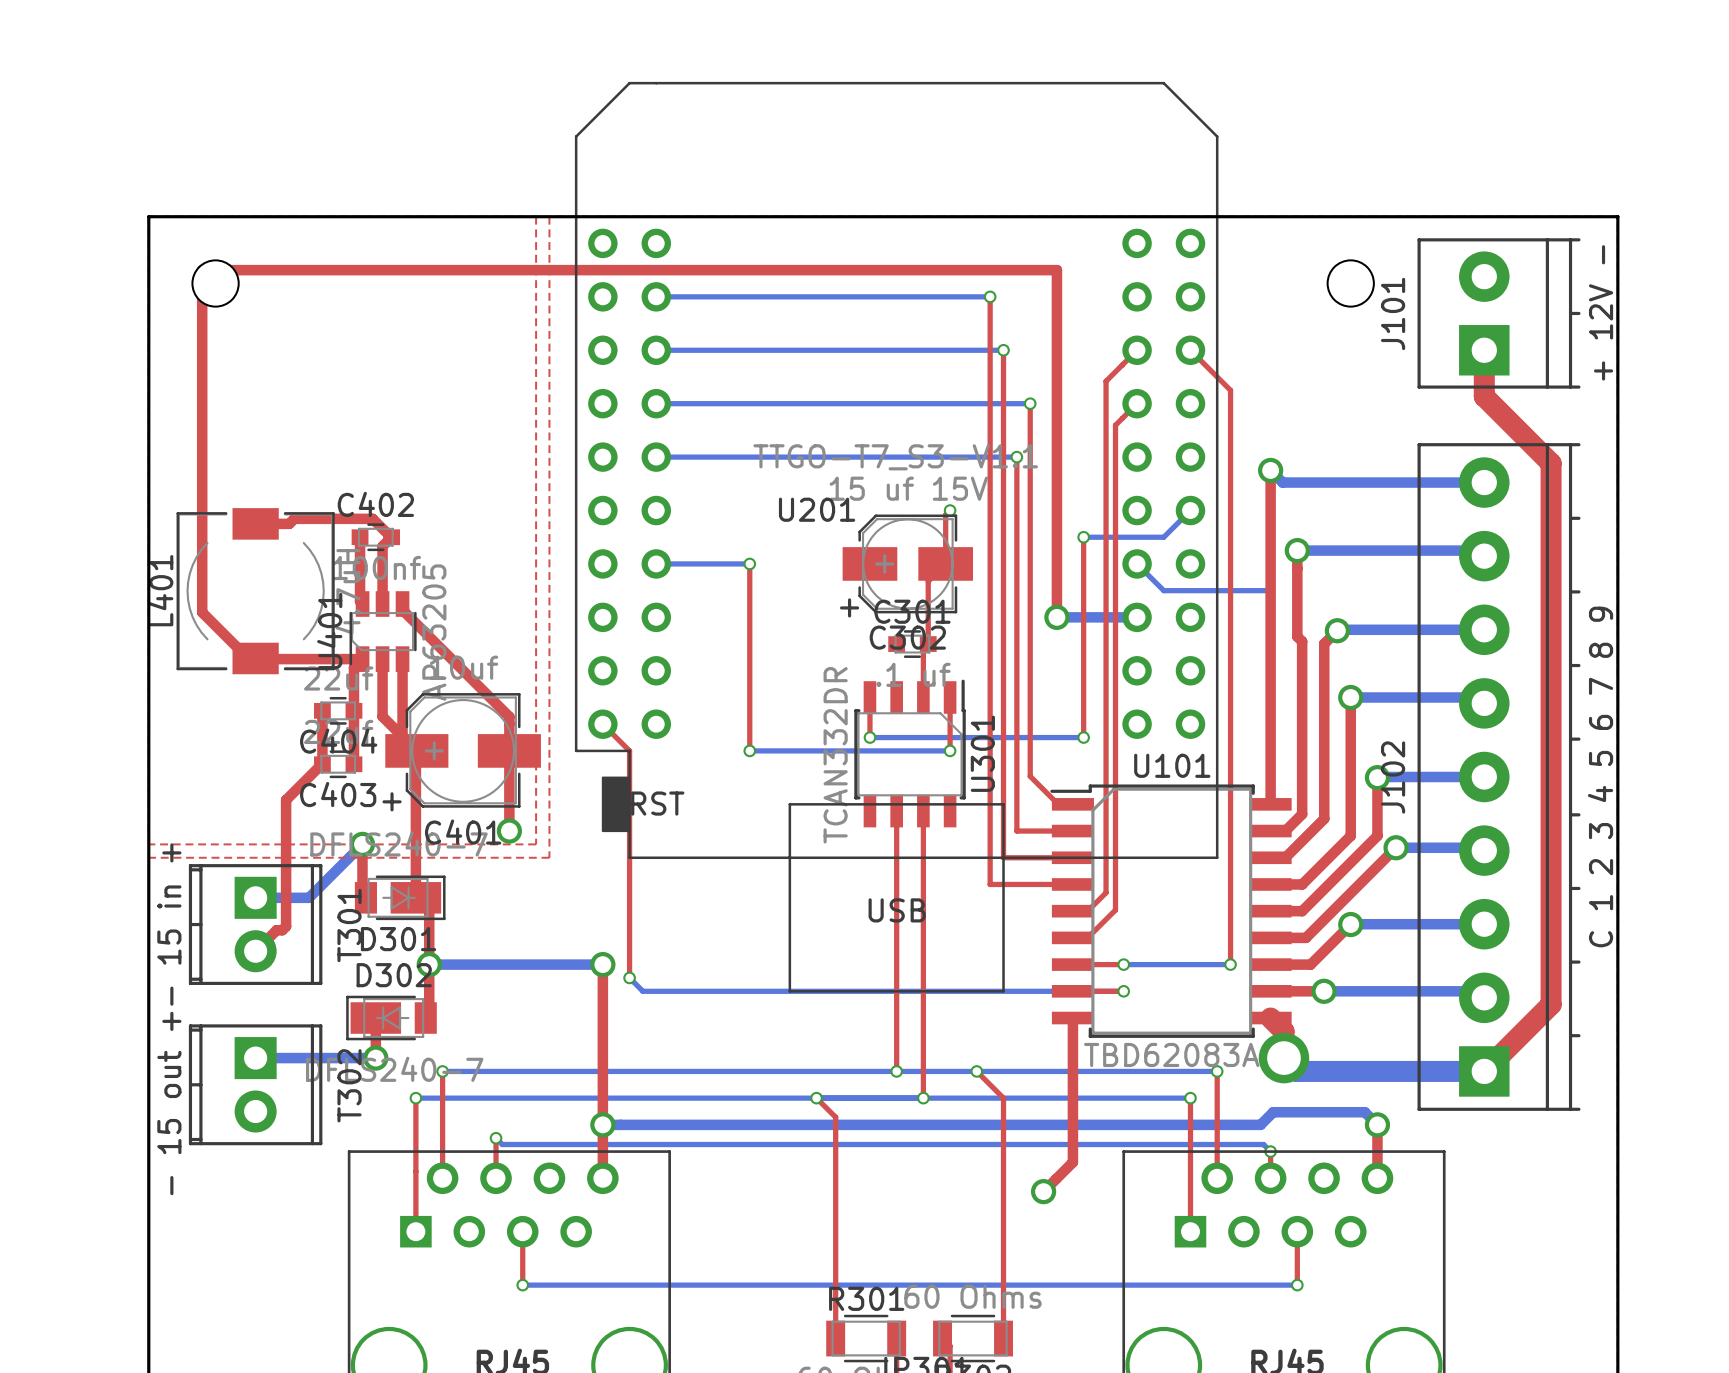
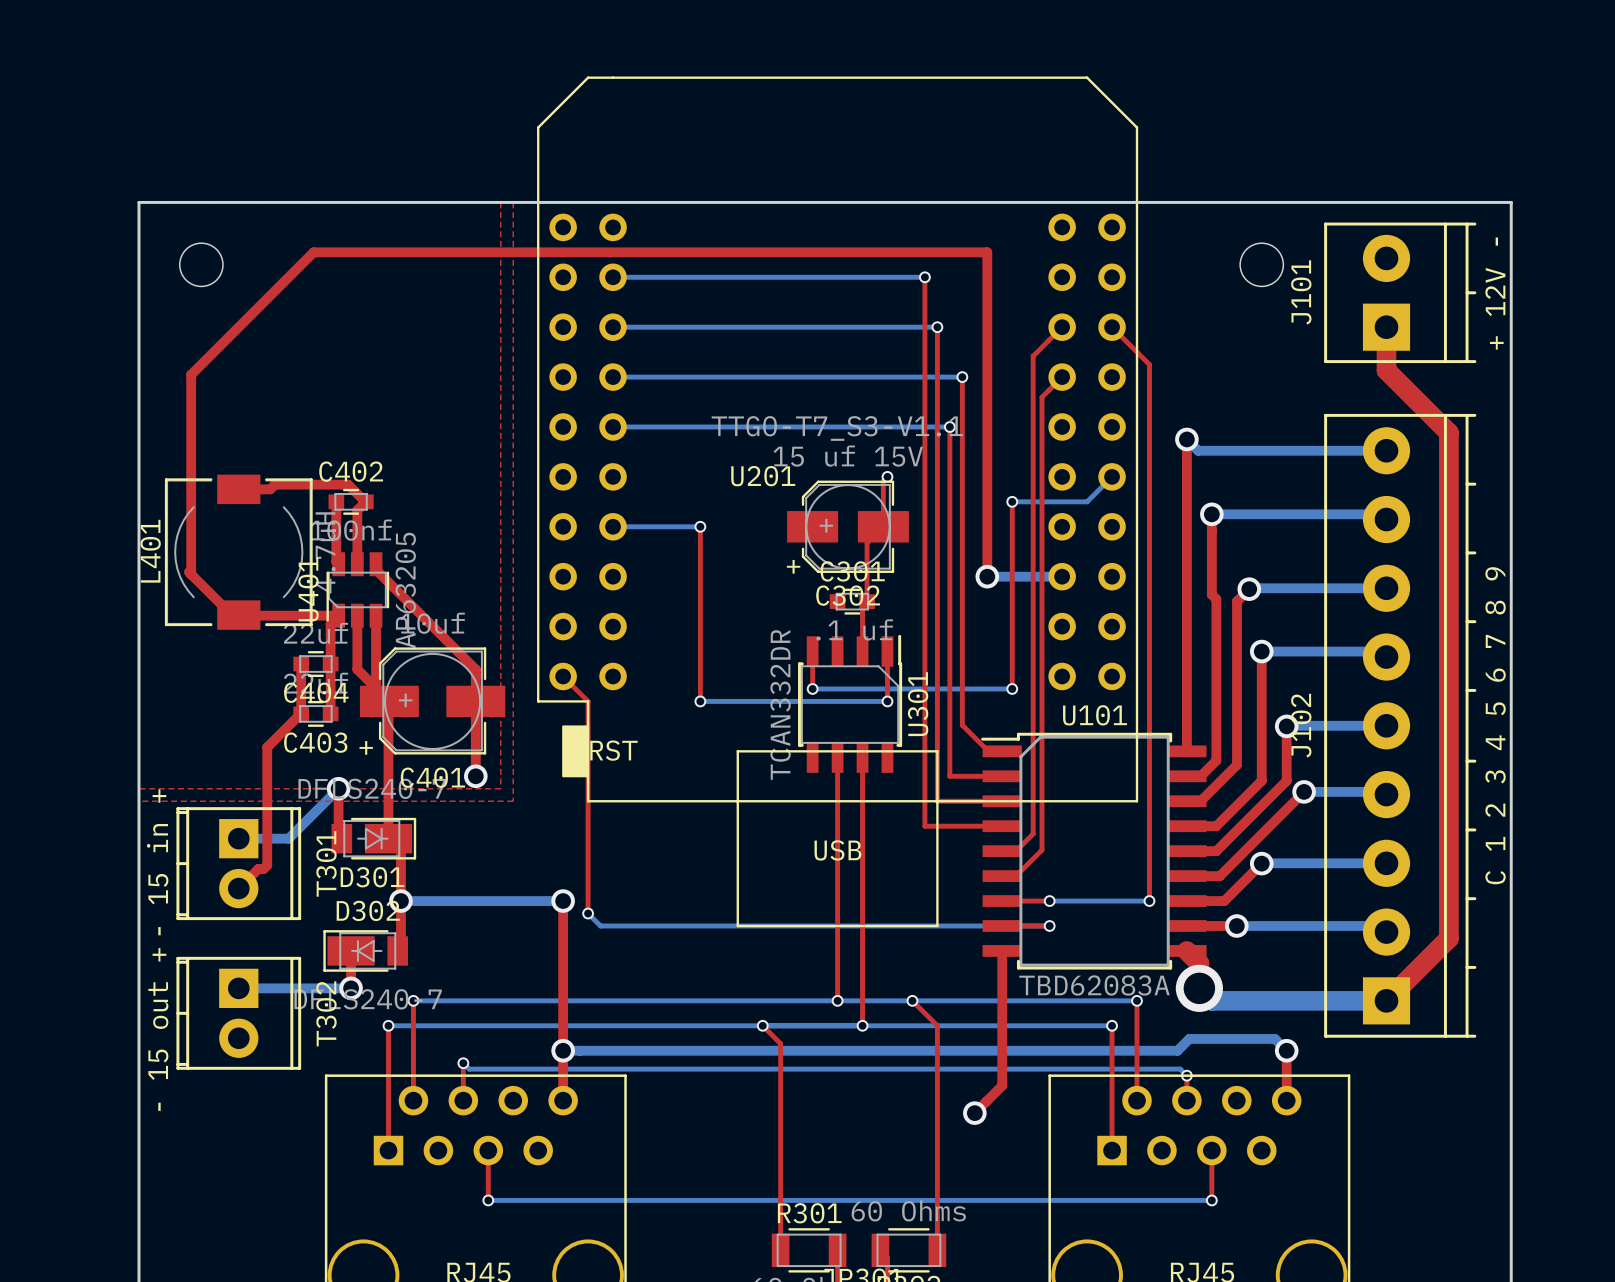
top track: (335, 270) (202, 270) (202, 612) -> (313, 252) (191, 374) (191, 574)
bottom track: (1137, 563) (1163, 590) (1270, 590) -> none

